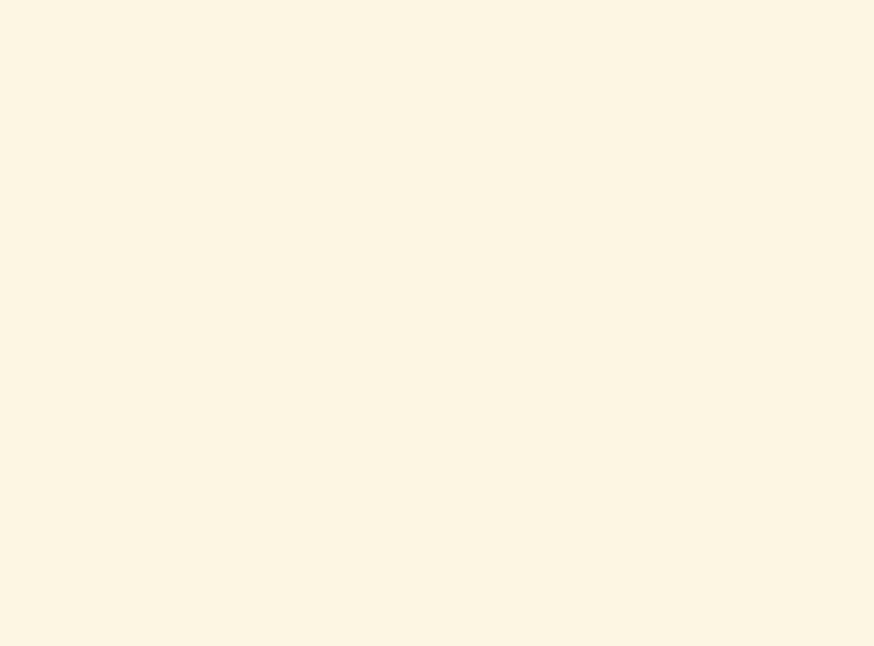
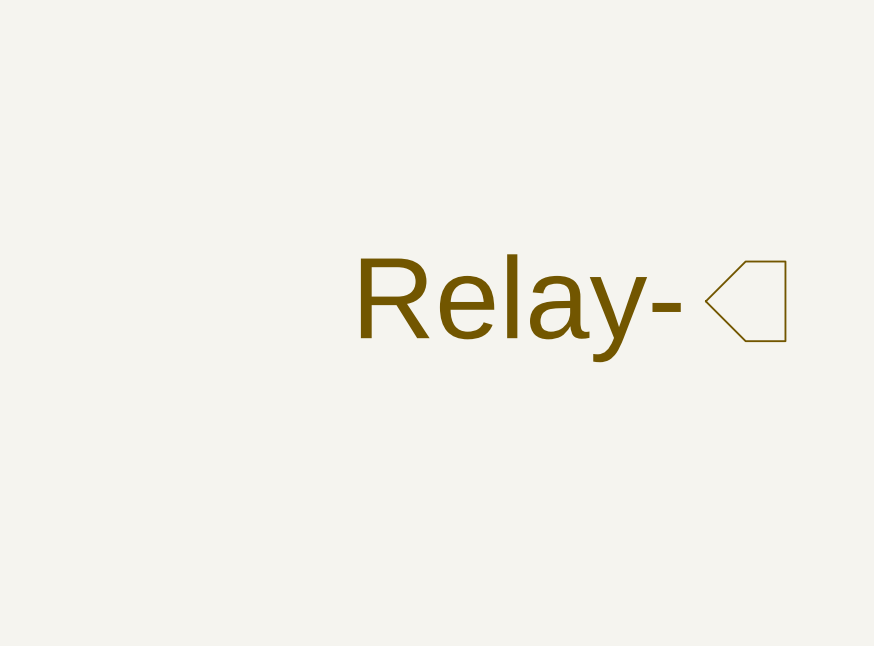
hierarchical label: none -> Relay- (520, 308)

